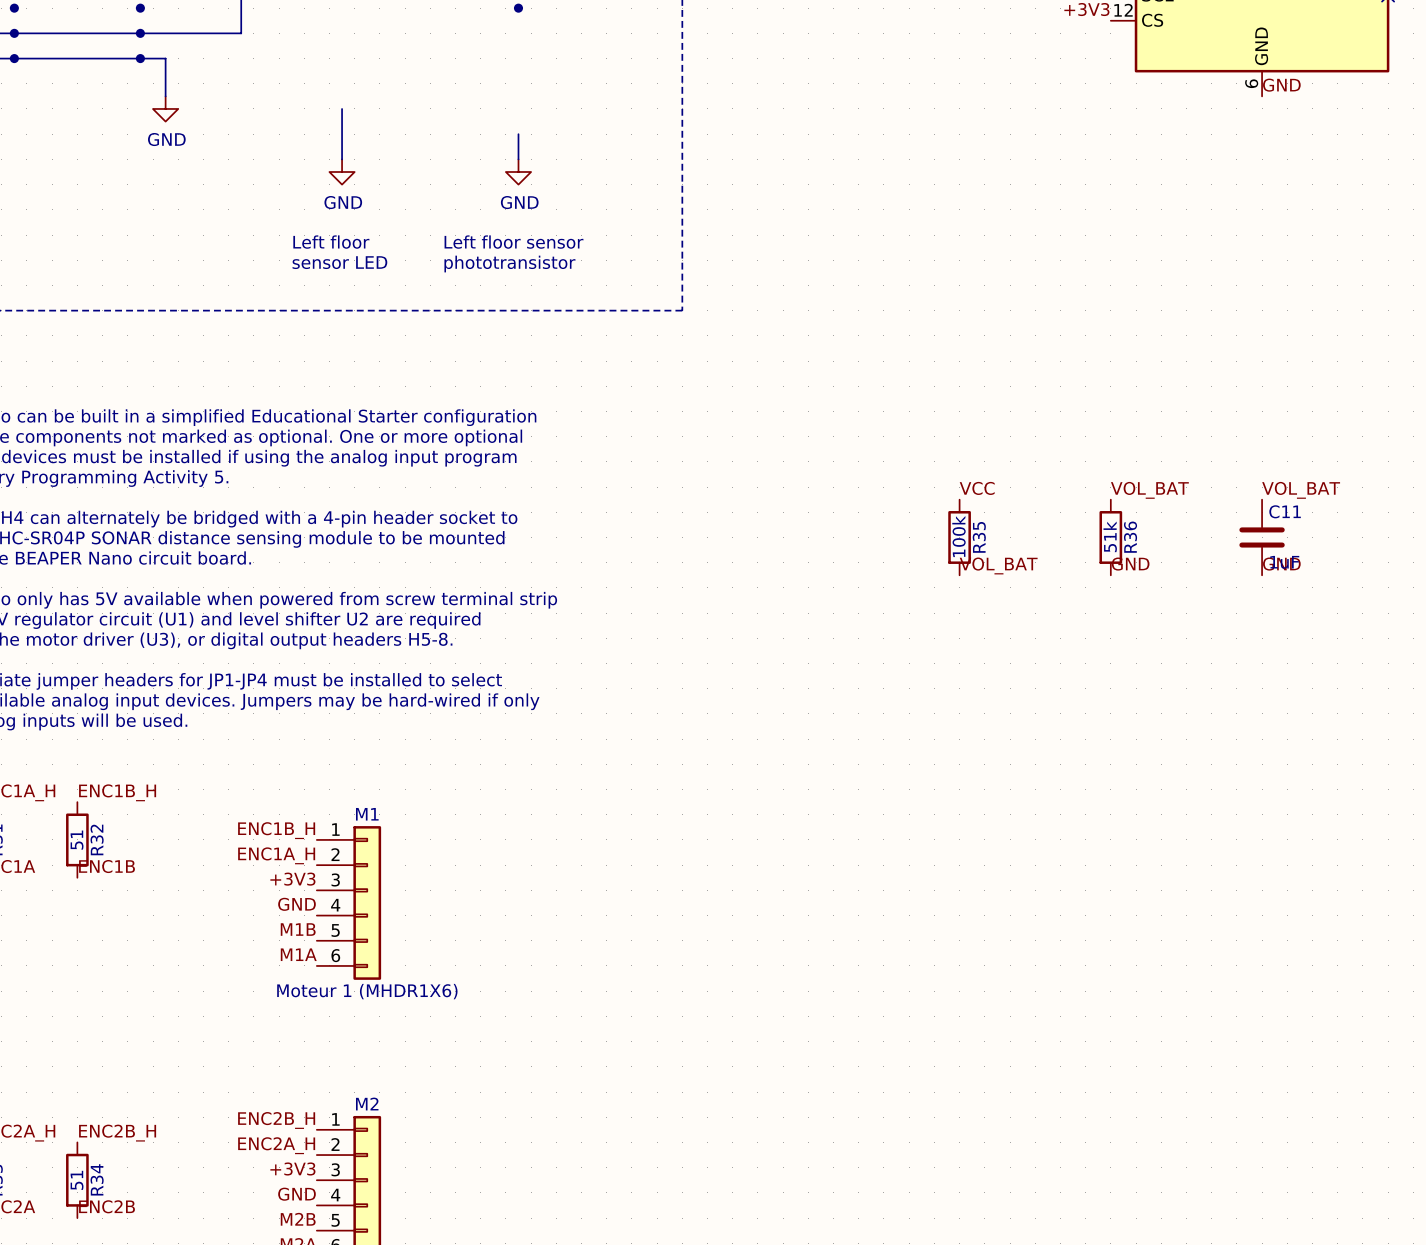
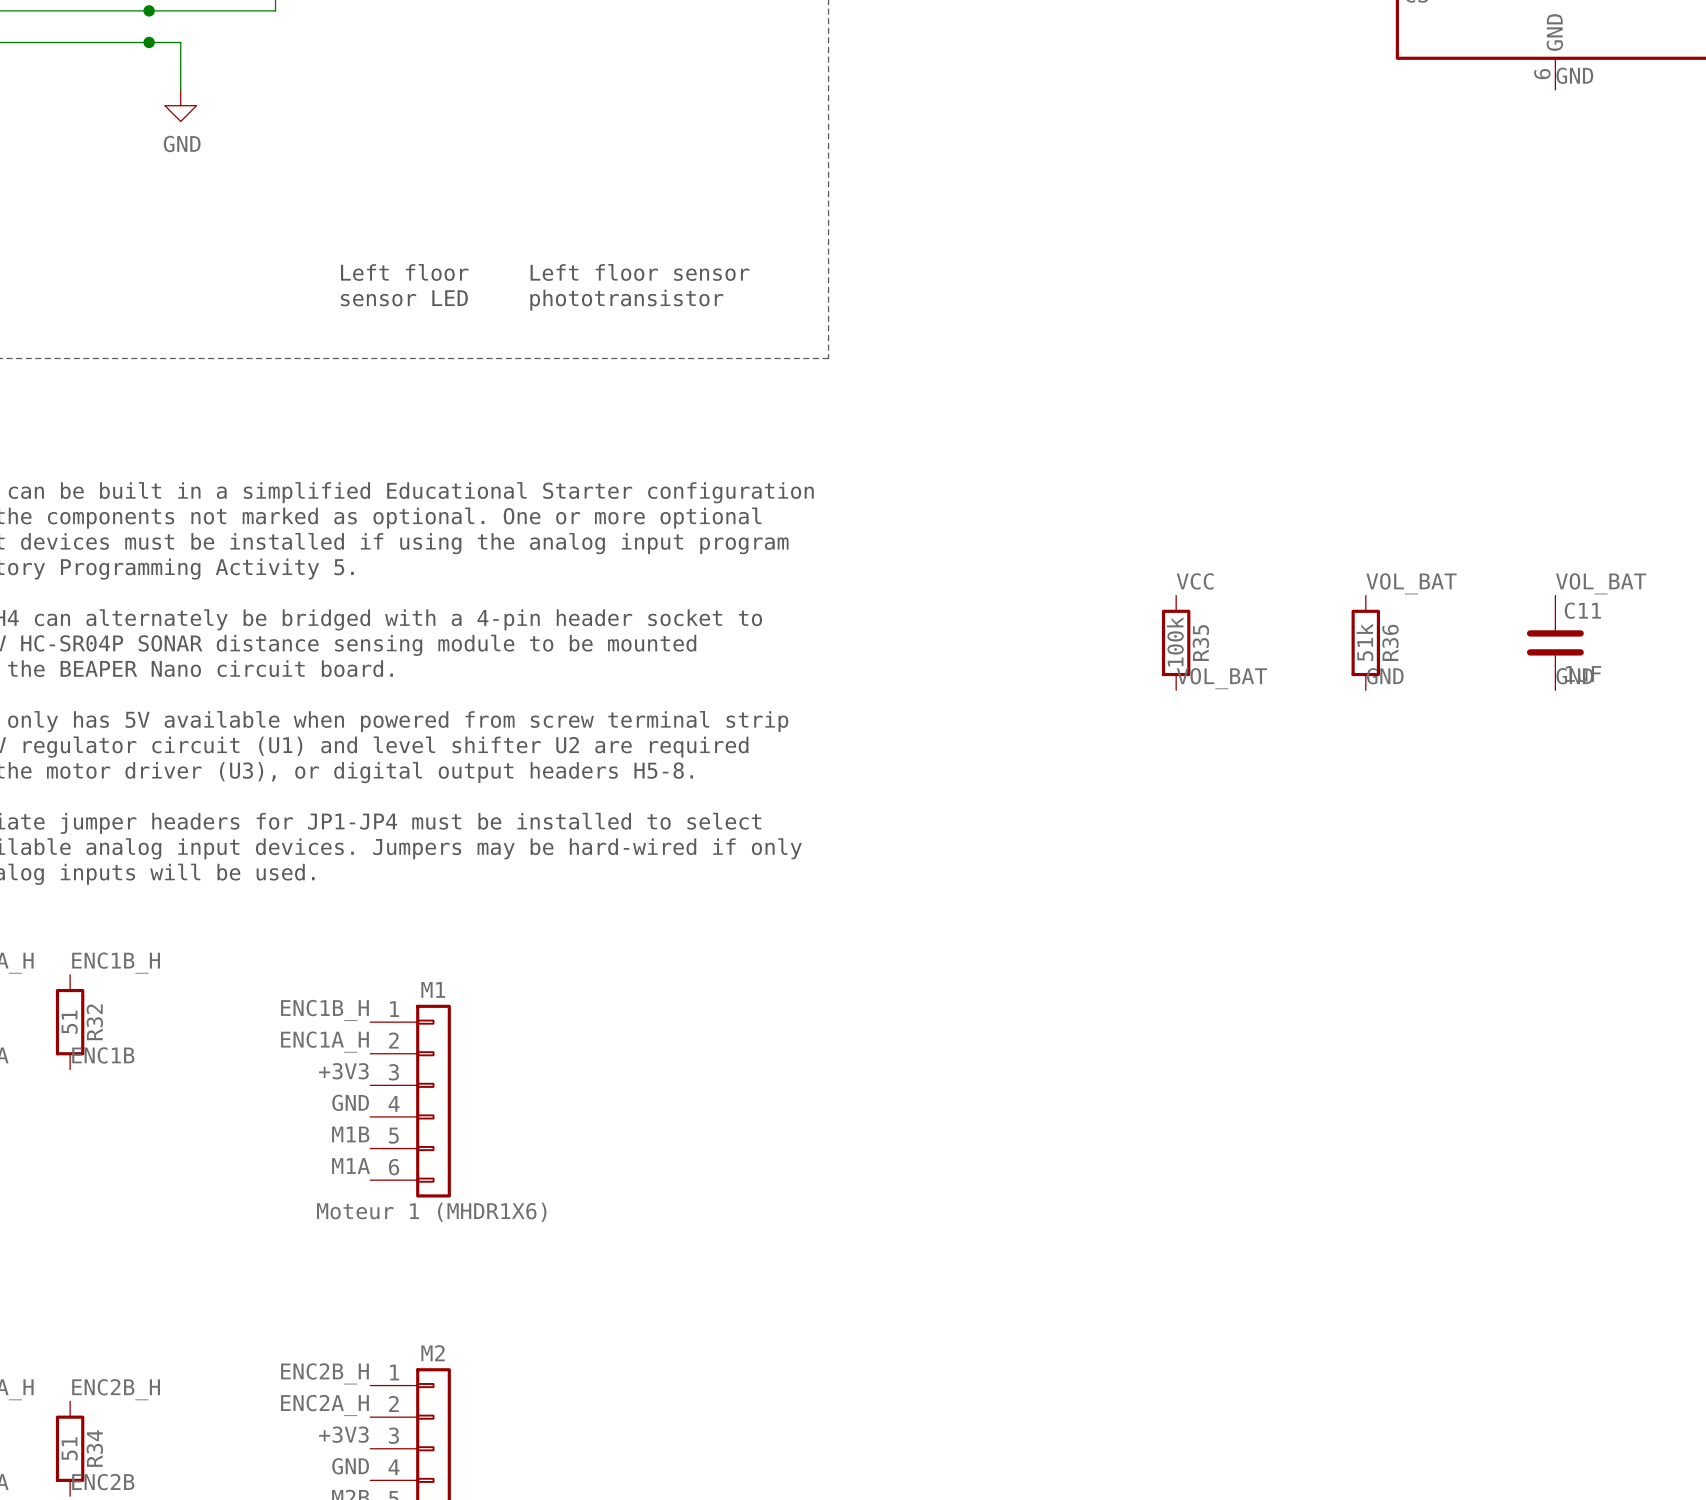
wire: (342, 108) (342, 159) -> none
wire: (518, 134) (518, 159) -> none
power symbol: GND (342, 172) -> none
power symbol: GND (518, 172) -> none

